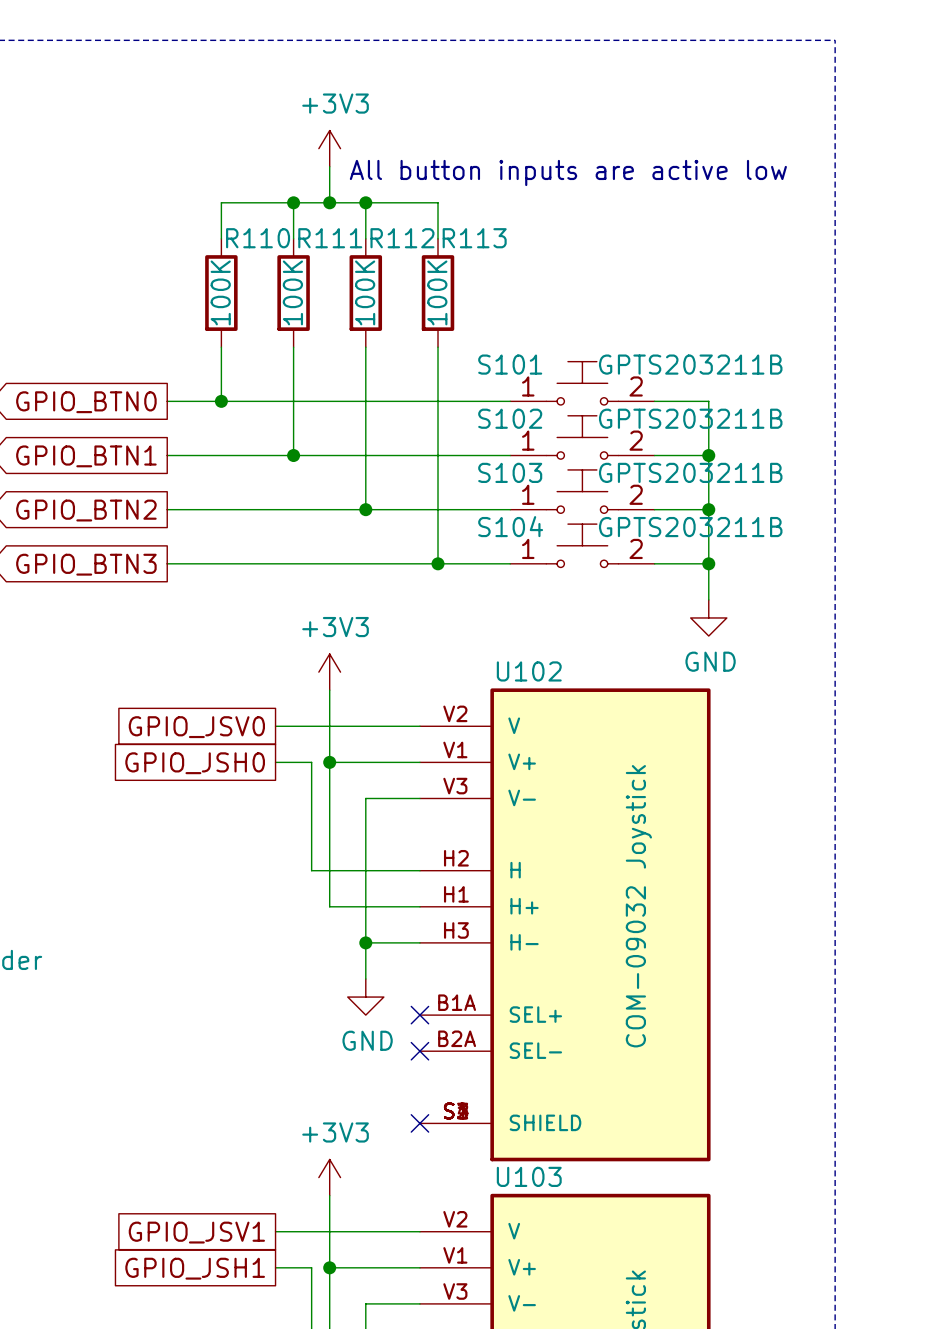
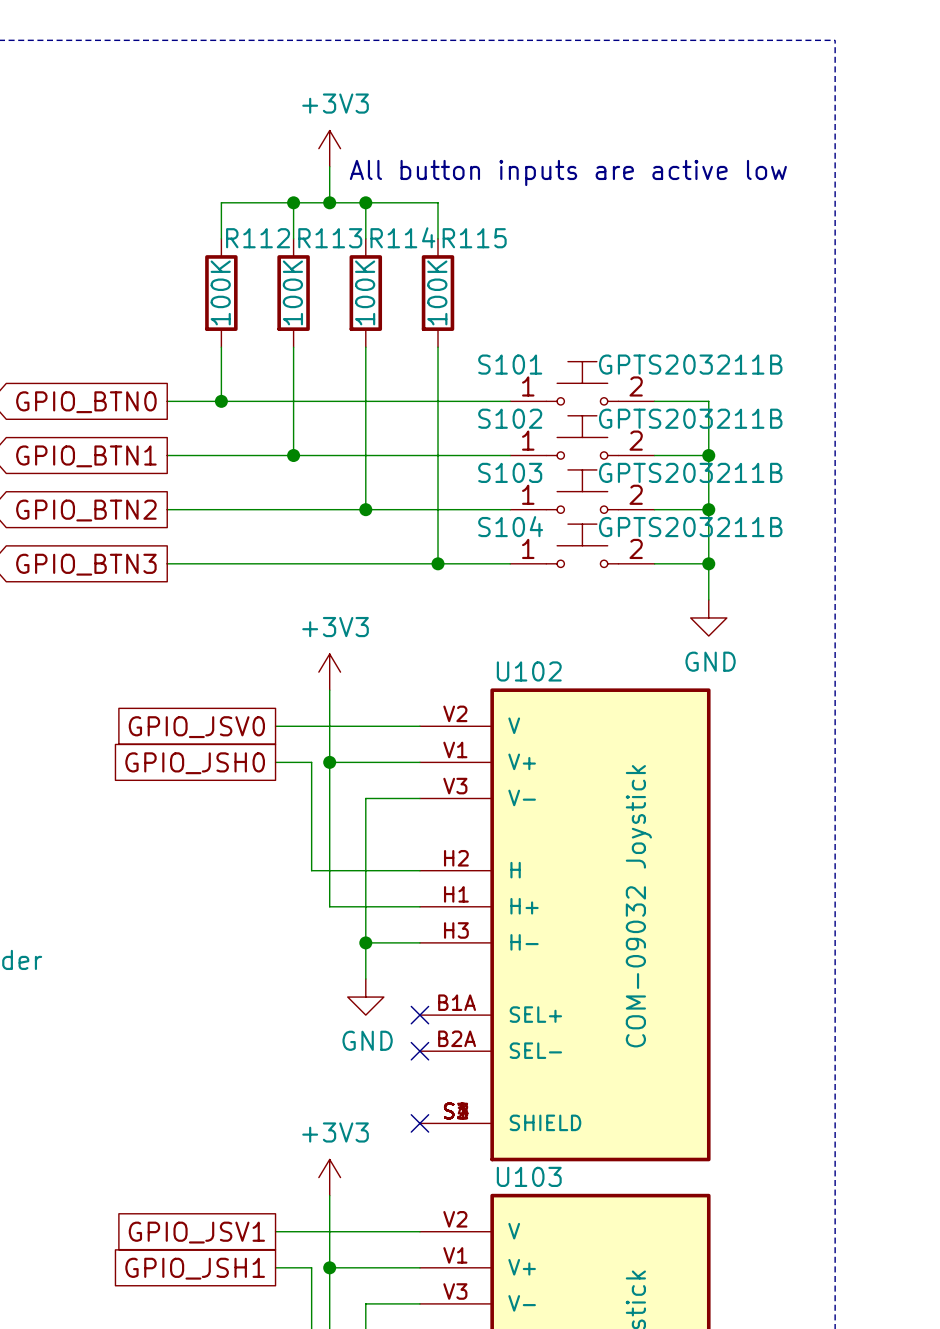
R110 name: R110 (258, 238) -> R112 (258, 238)
R111 name: R111 (330, 238) -> R113 (330, 238)
R112 name: R112 (402, 238) -> R114 (402, 237)
R113 name: R113 (474, 238) -> R115 (474, 238)

